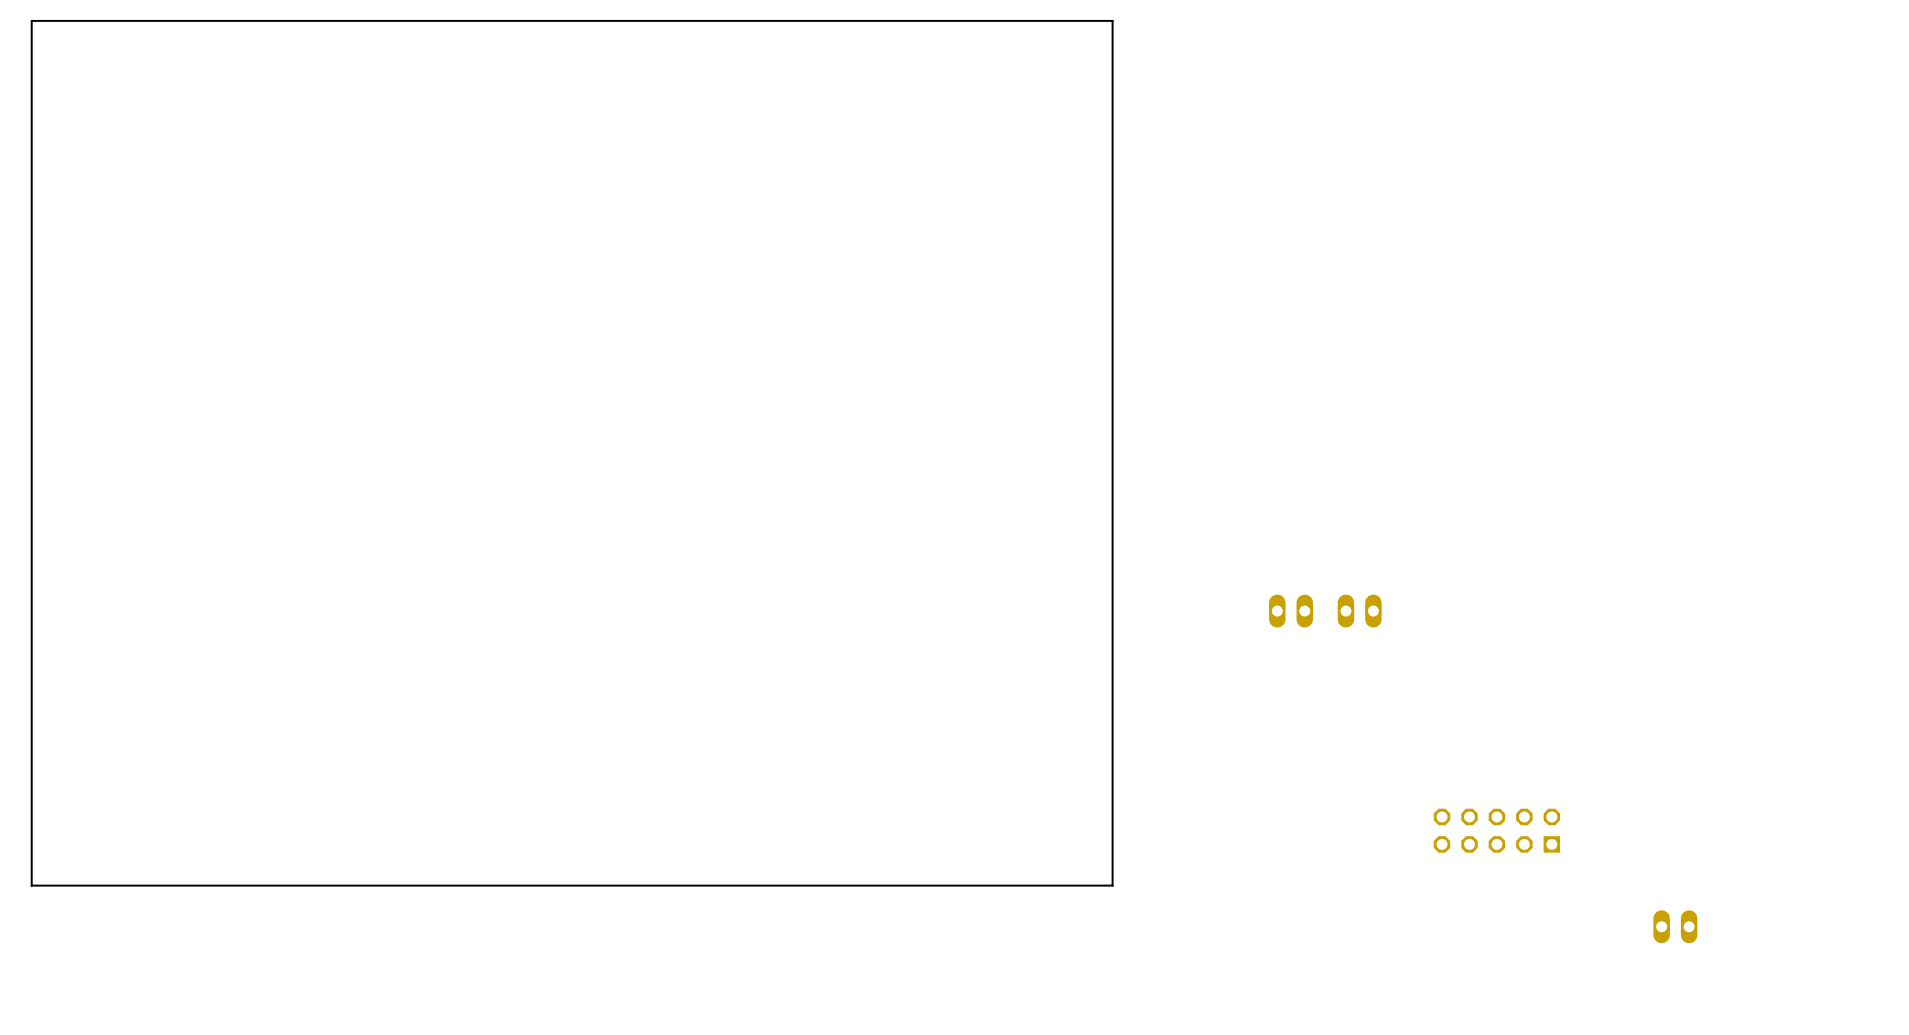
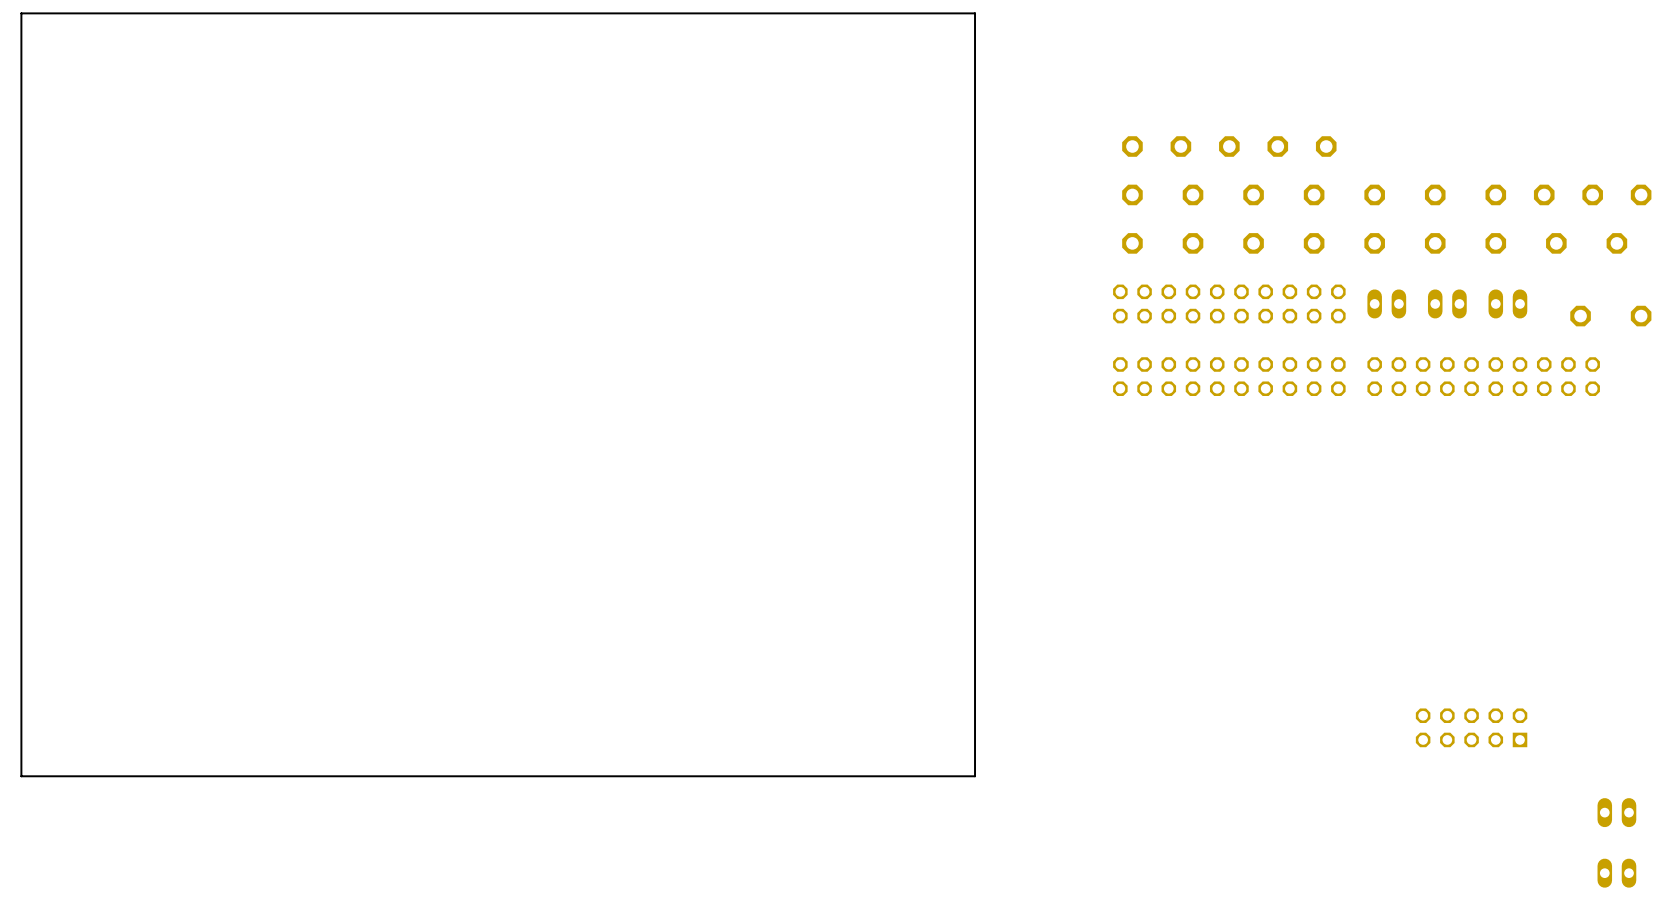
part: none -> (1132, 146)
part: none -> (1180, 146)
part: none -> (1229, 146)
part: none -> (1277, 146)
part: none -> (1326, 146)
part: none -> (1132, 194)
part: none -> (1193, 194)
part: none -> (1253, 194)
part: none -> (1314, 194)
part: none -> (1374, 194)
part: none -> (1435, 194)
part: none -> (1495, 194)
part: none -> (1544, 194)
part: none -> (1592, 194)
part: none -> (1641, 194)
part: none -> (1132, 243)
part: none -> (1193, 243)
part: none -> (1253, 243)
part: none -> (1314, 243)
part: none -> (1374, 243)
part: none -> (1435, 243)
part: none -> (1495, 243)
part: none -> (1556, 243)
part: none -> (1616, 243)
part: none -> (1229, 303)
part: none -> (1386, 303)
part: none -> (1447, 303)
part: none -> (1507, 303)
part: none -> (1580, 316)
part: none -> (1641, 316)
part: none -> (1229, 376)
part: none -> (1483, 376)
part: (1291, 611) -> none
part: (1359, 611) -> none
part position: (1496, 830) -> (1471, 727)
part: (1675, 926) -> none
part: none -> (1616, 812)
part: none -> (1616, 873)

